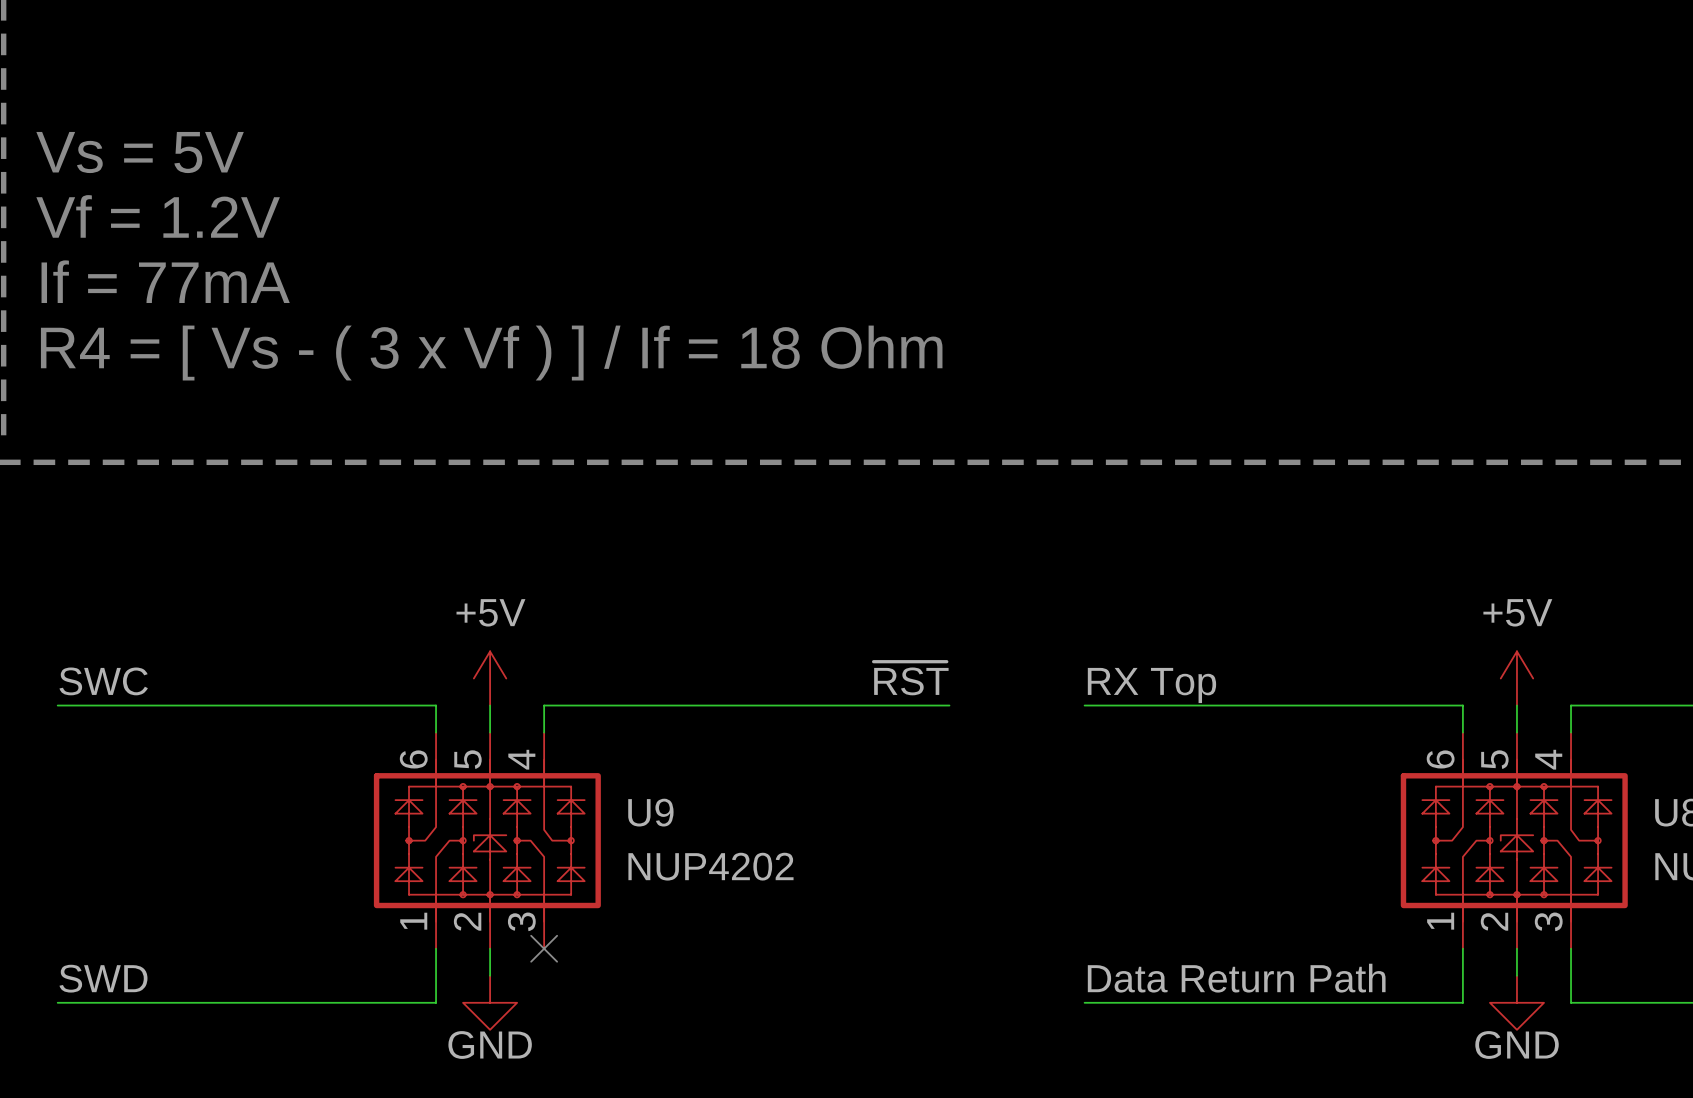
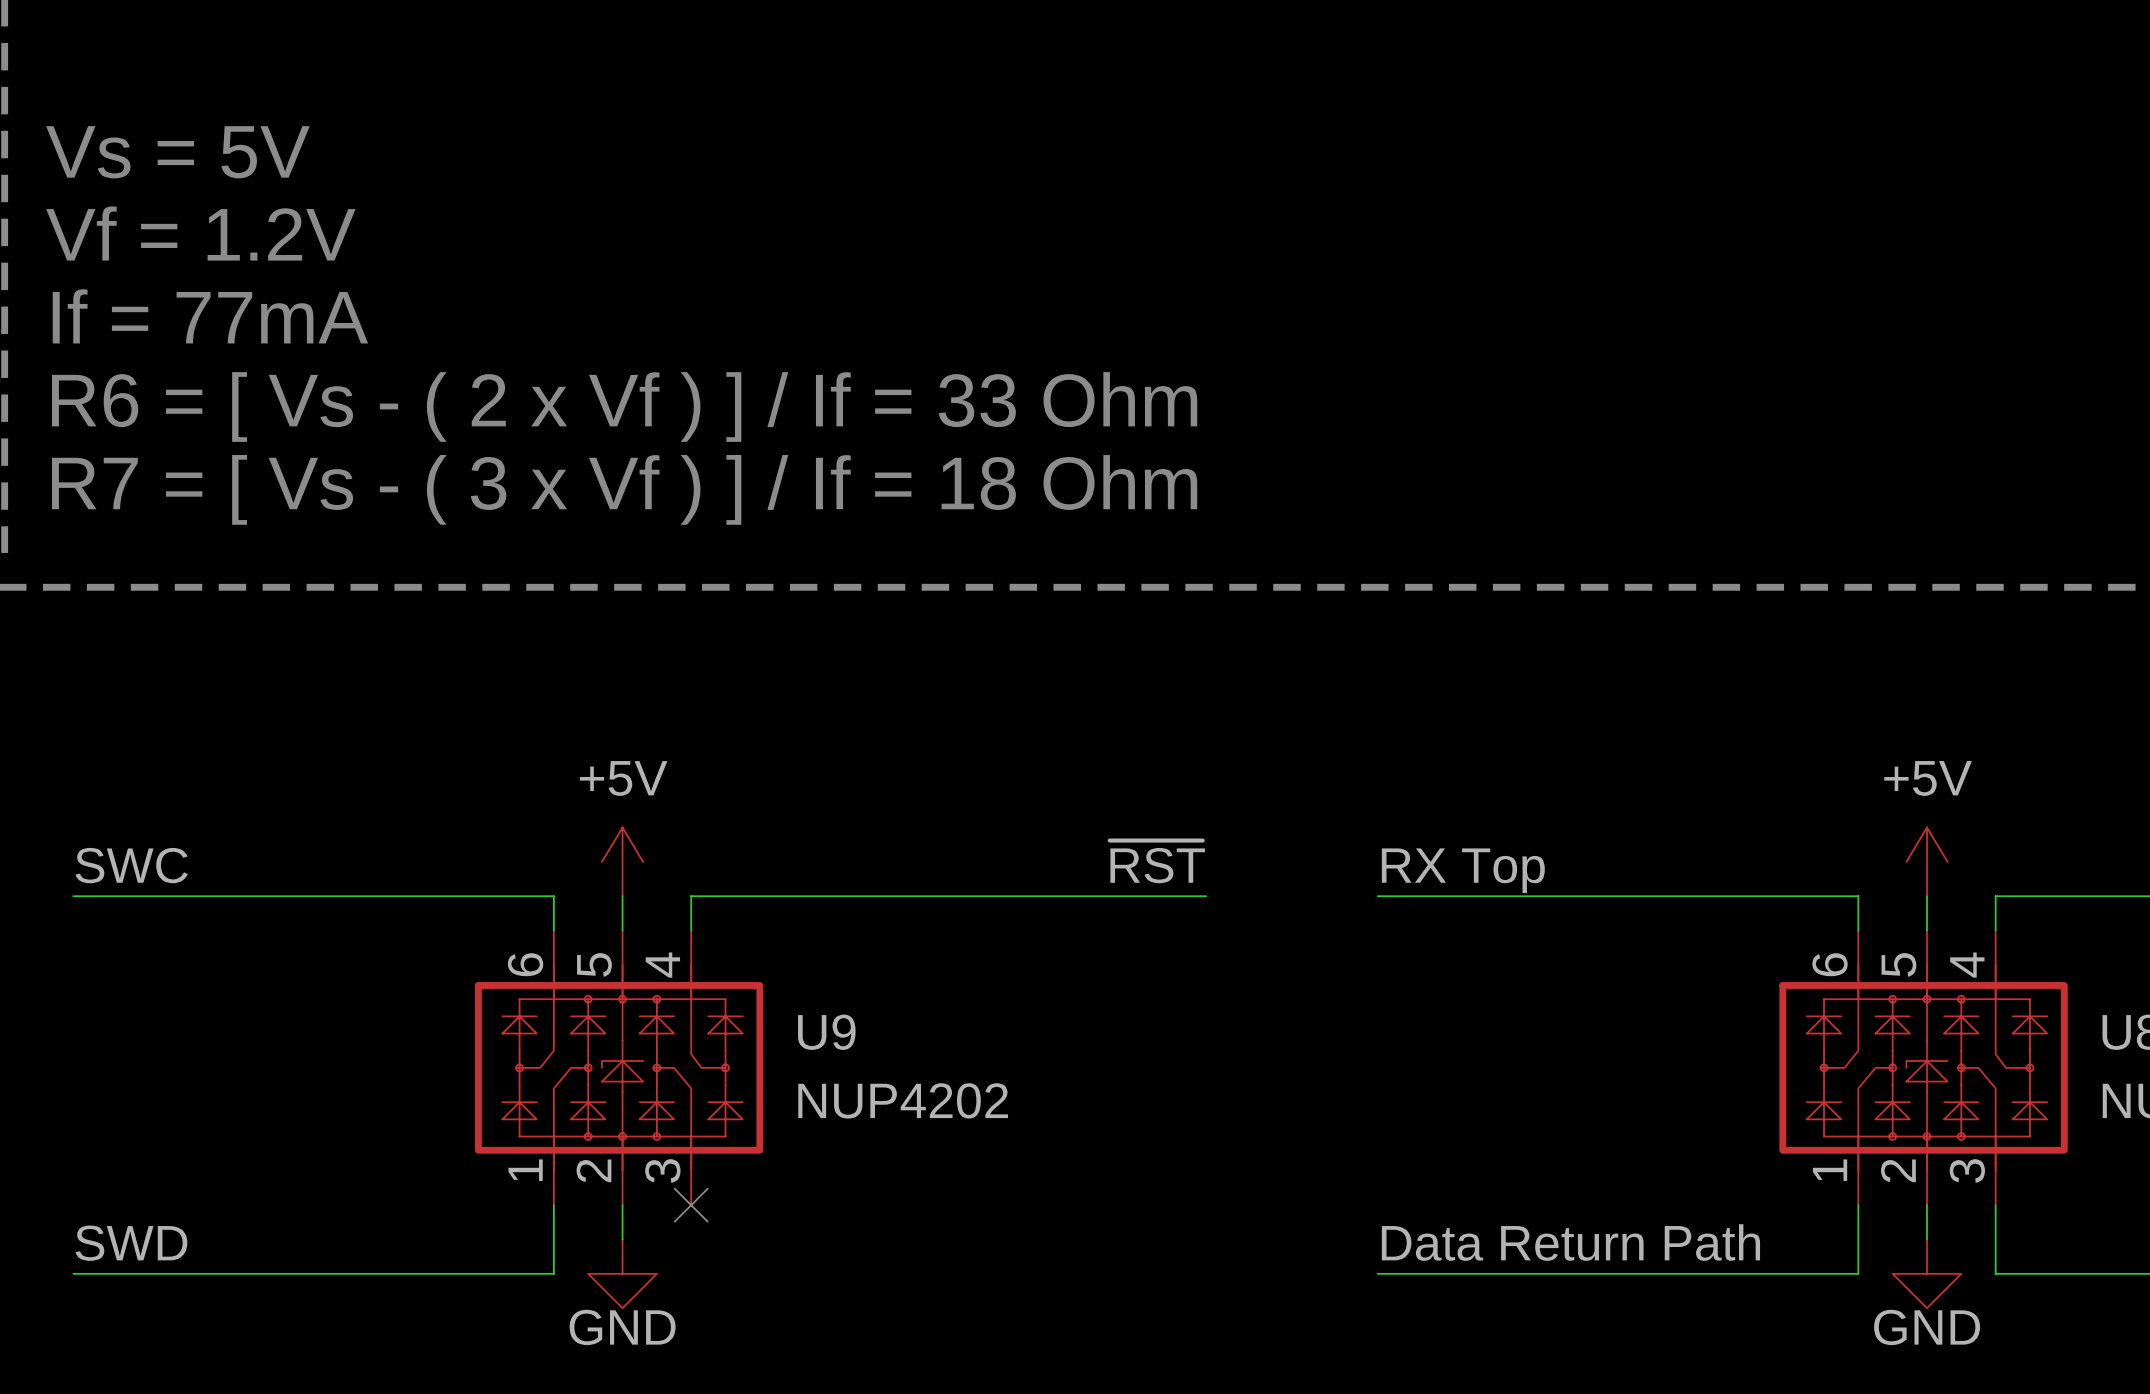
text position: Vs = 5V (140, 152) -> Vs = 5V (177, 152)
text position: Vf = 1.2V (158, 216) -> Vf = 1.2V (200, 233)
text position: If = 77mA (165, 281) -> If = 77mA (210, 316)
text: none -> R6 = [ Vs - ( 2 x Vf ) ] / If = 33 Ohm (624, 407)
text: R4 = [ Vs - ( 3 x Vf ) ] / If = 18 Ohm (491, 353) -> none
text: none -> R7 = [ Vs - ( 3 x Vf ) ] / If = 18 Ohm (624, 489)

